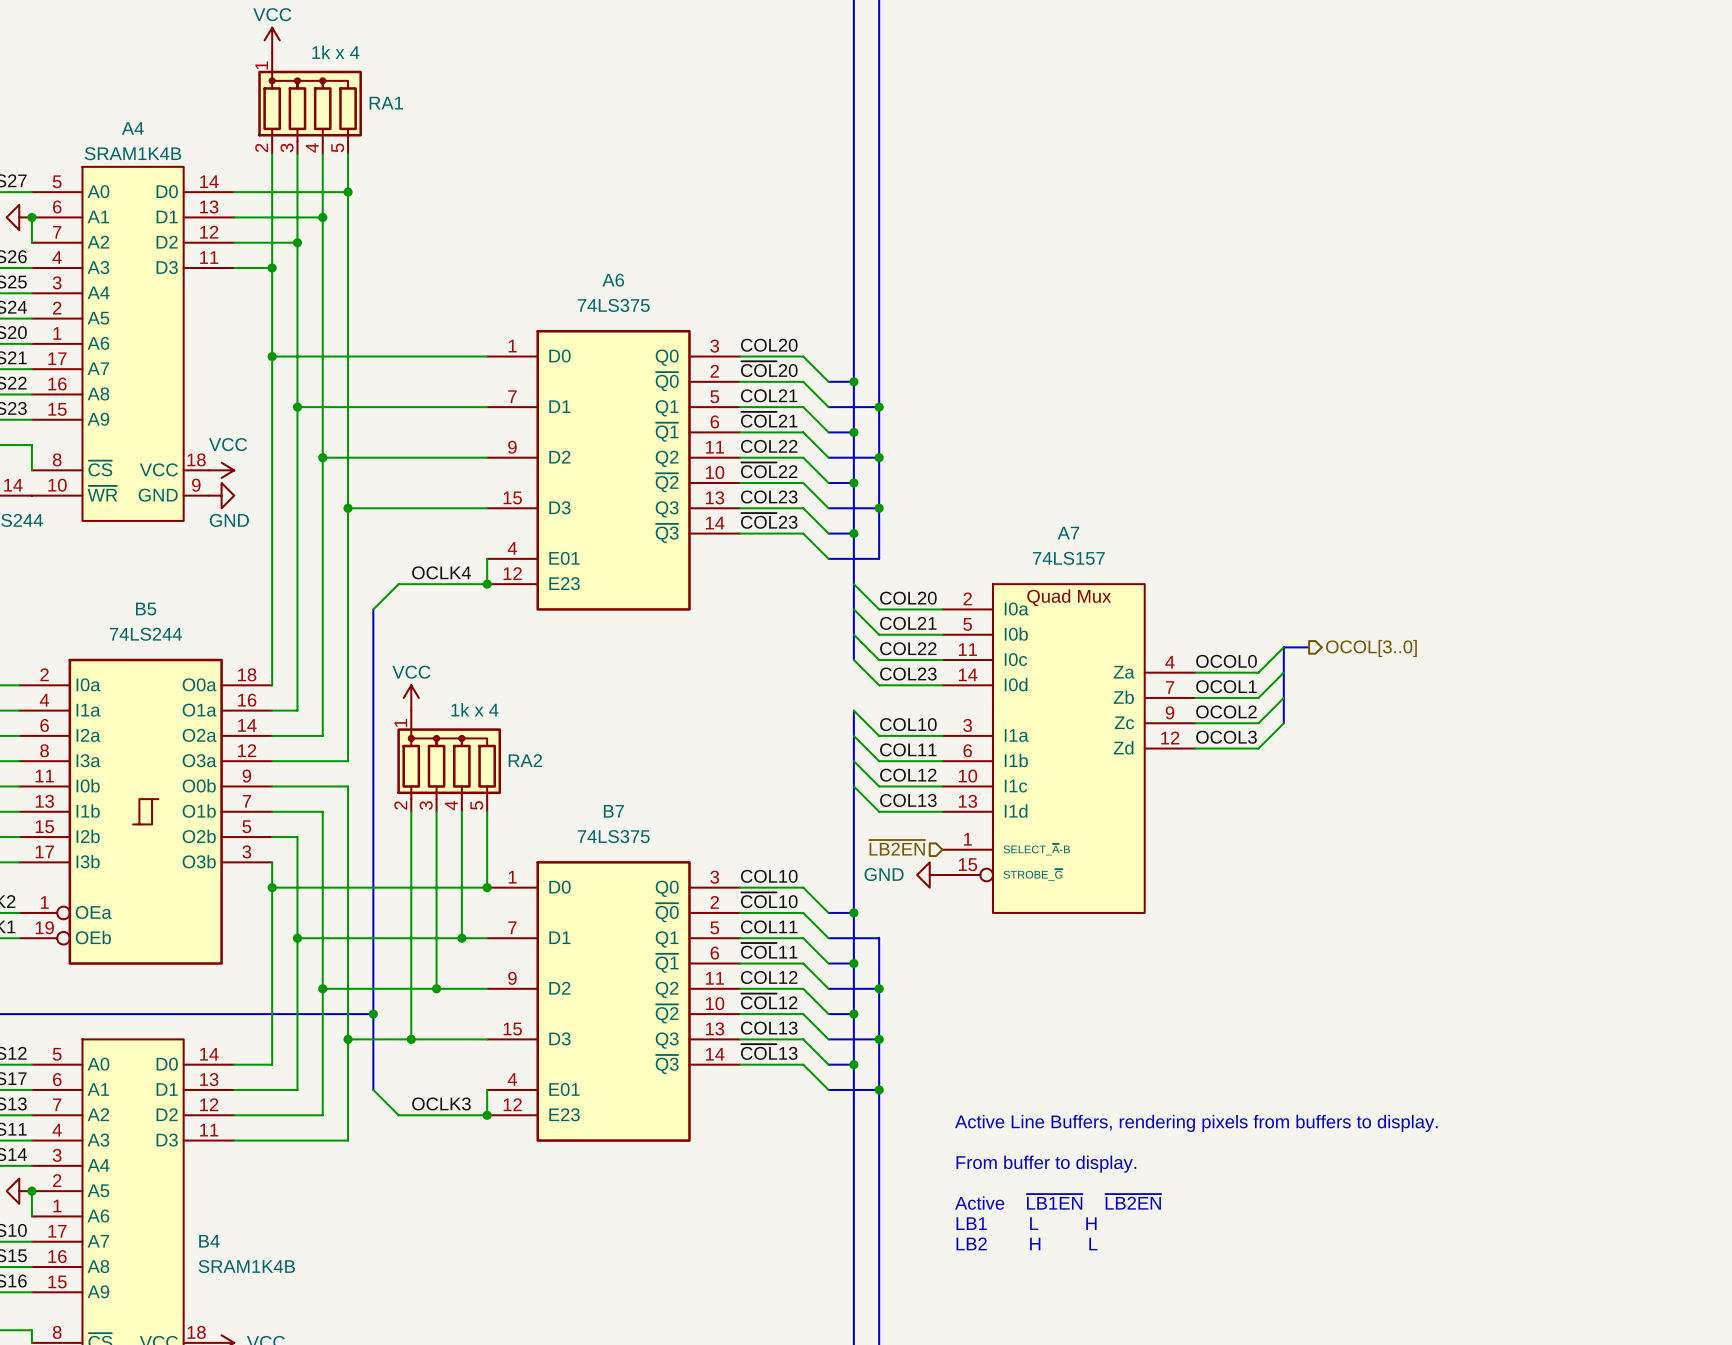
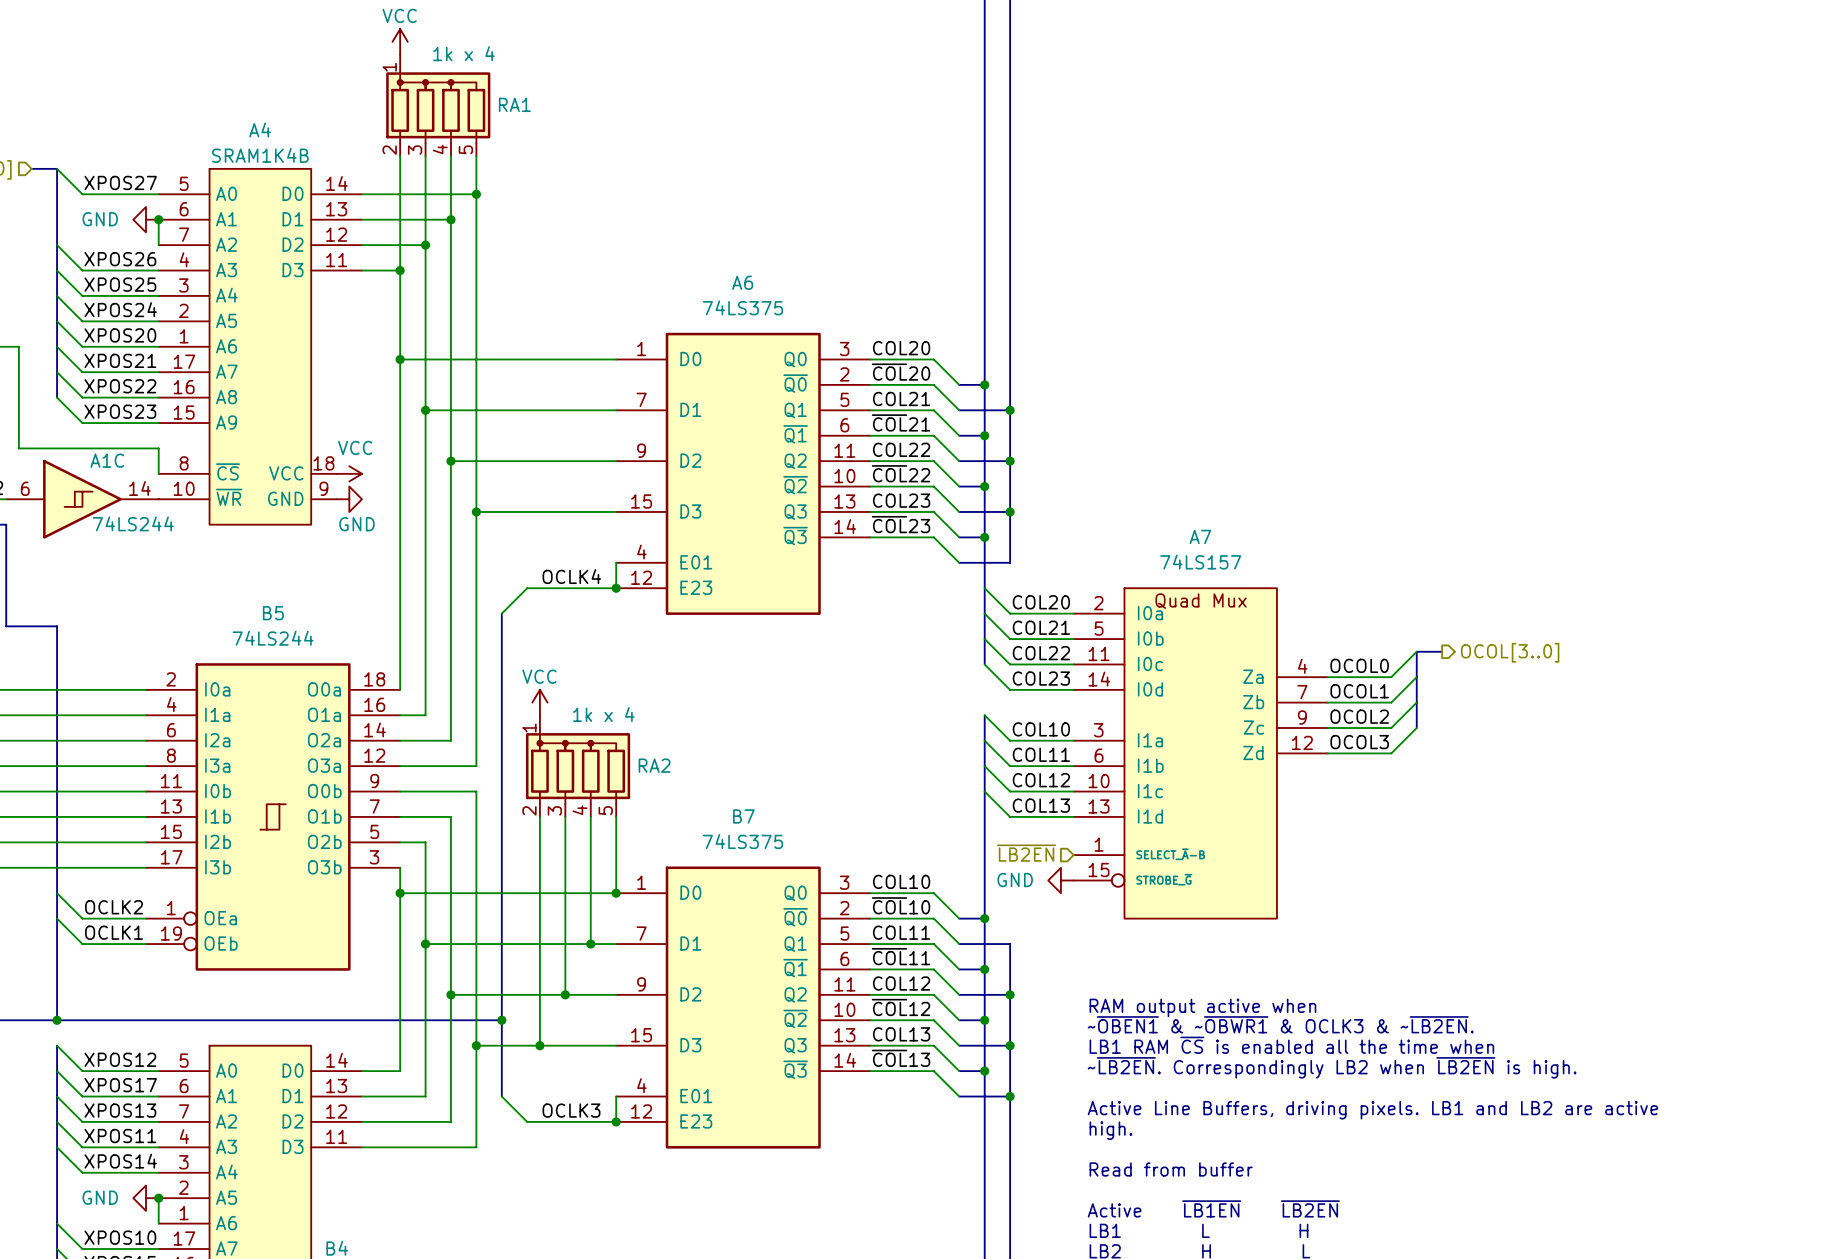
text: none -> RAM output active when (1202, 1007)
text: none -> ~~{OBEN1} & ~~{OBWR1} & OCLK3 & ~~{LB2EN}. (1280, 1024)
text: none -> LB1 RAM ~{CS} is enabled all the time when (1291, 1045)
text: none -> ~~{LB2EN}. Correspondingly LB2 when ~{LB2EN} is high. (1332, 1067)
text: none -> Active Line Buffers, driving pixels. LB1 and LB2 are active (1372, 1110)
text: Active Line Buffers, rendering pixels from buffers to display. (1196, 1123) -> high. (1110, 1130)
text: From buffer to display. (1046, 1164) -> Read from buffer (1171, 1169)

